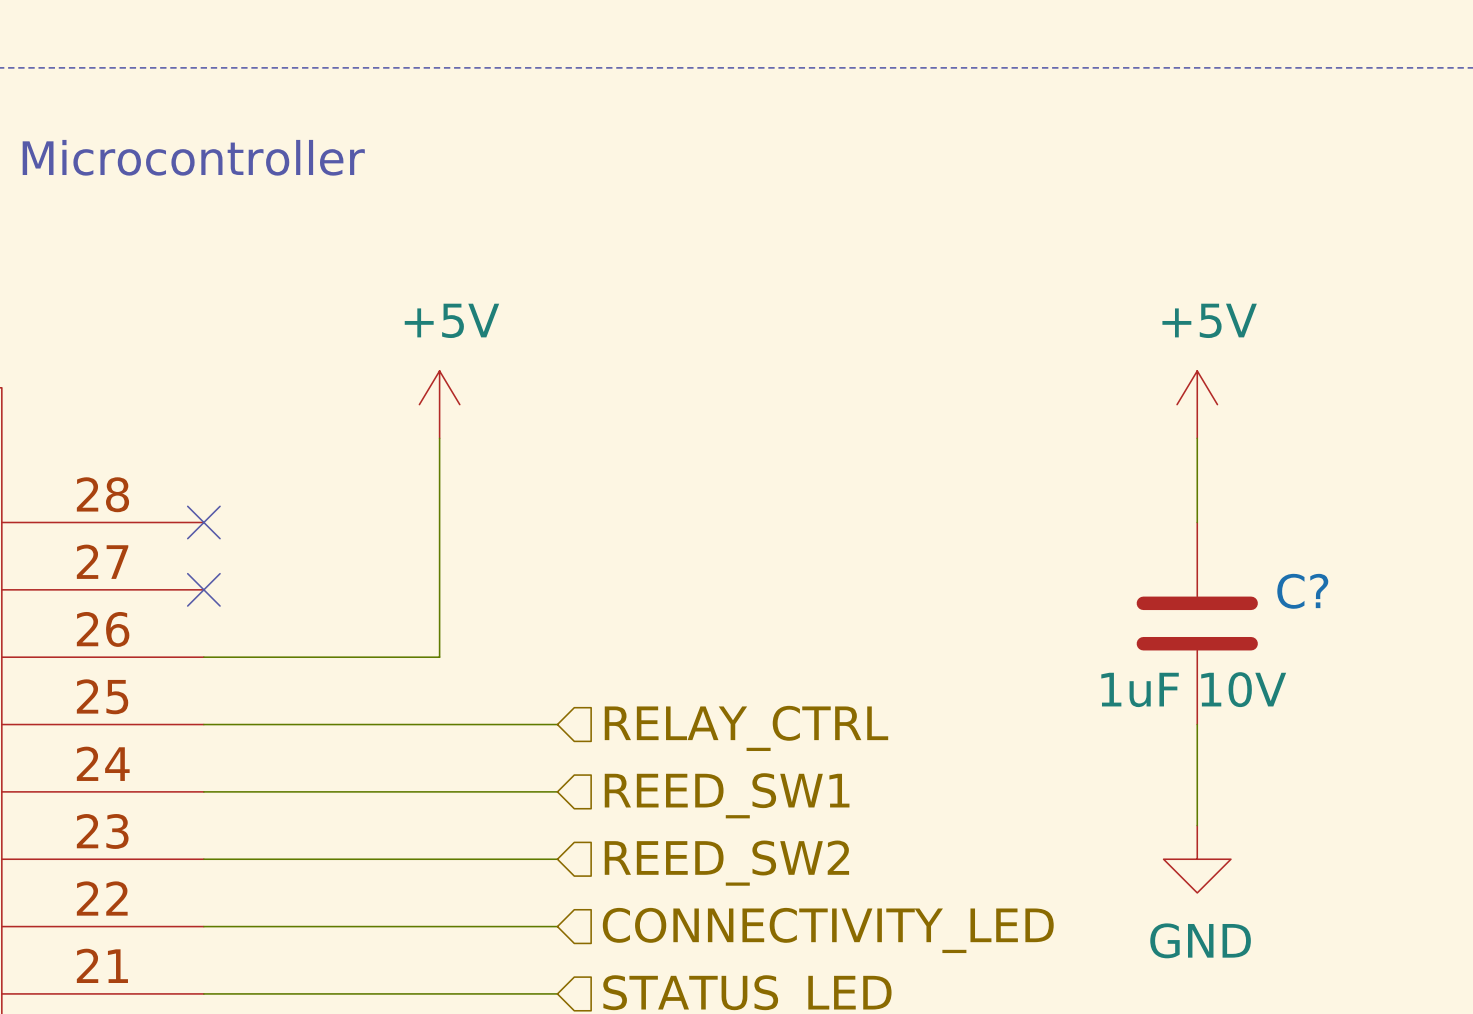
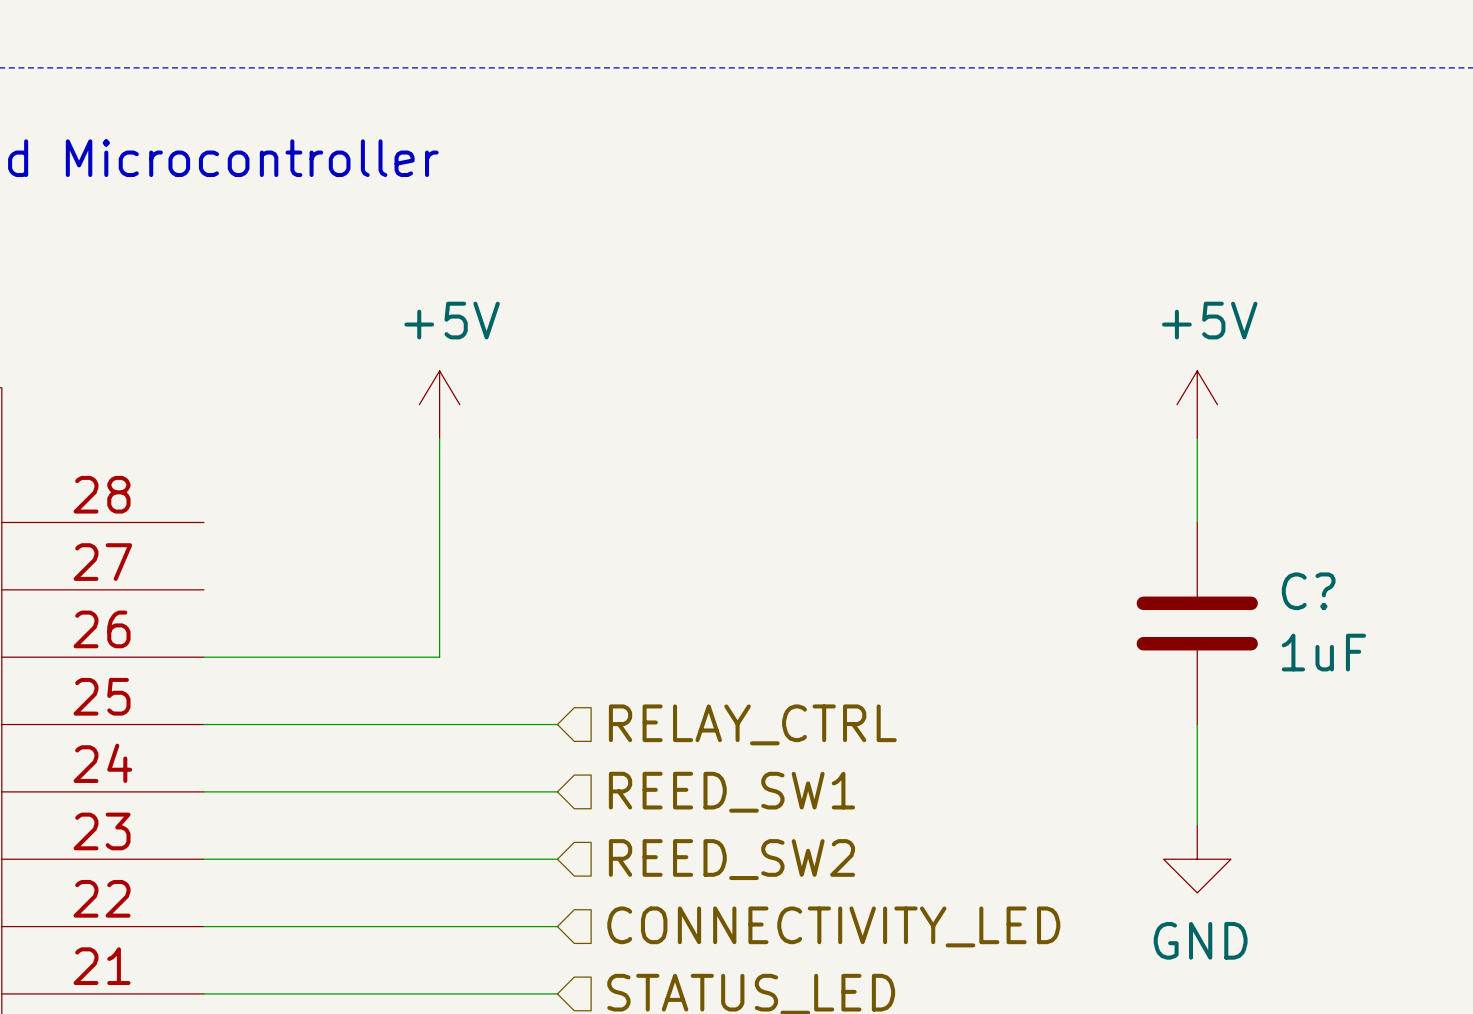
no-connect mark: (203, 522) -> none
no-connect mark: (203, 589) -> none
C? value: 1uF 10V (1193, 689) -> 1uF (1323, 652)

